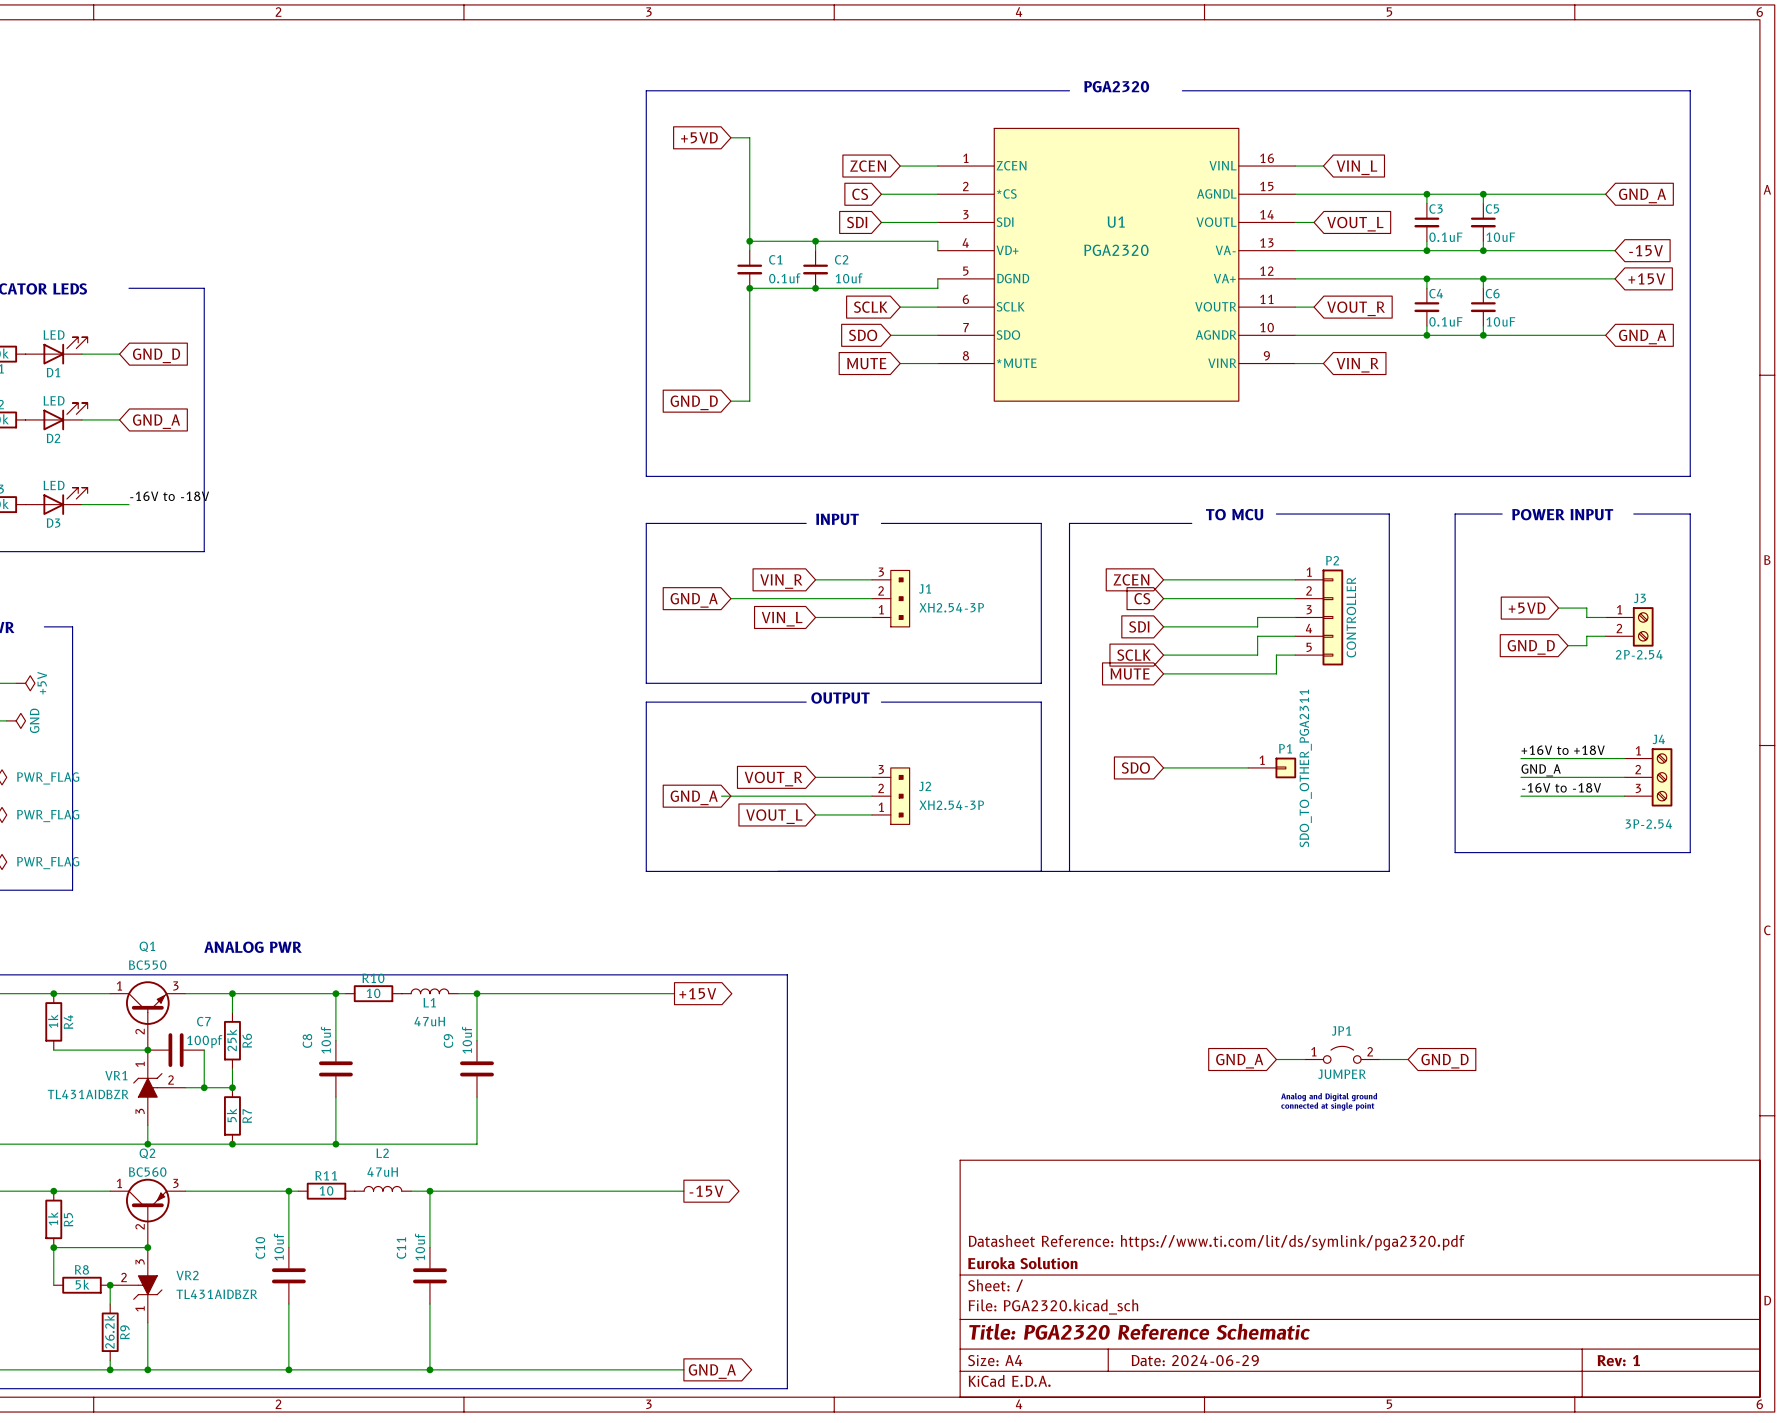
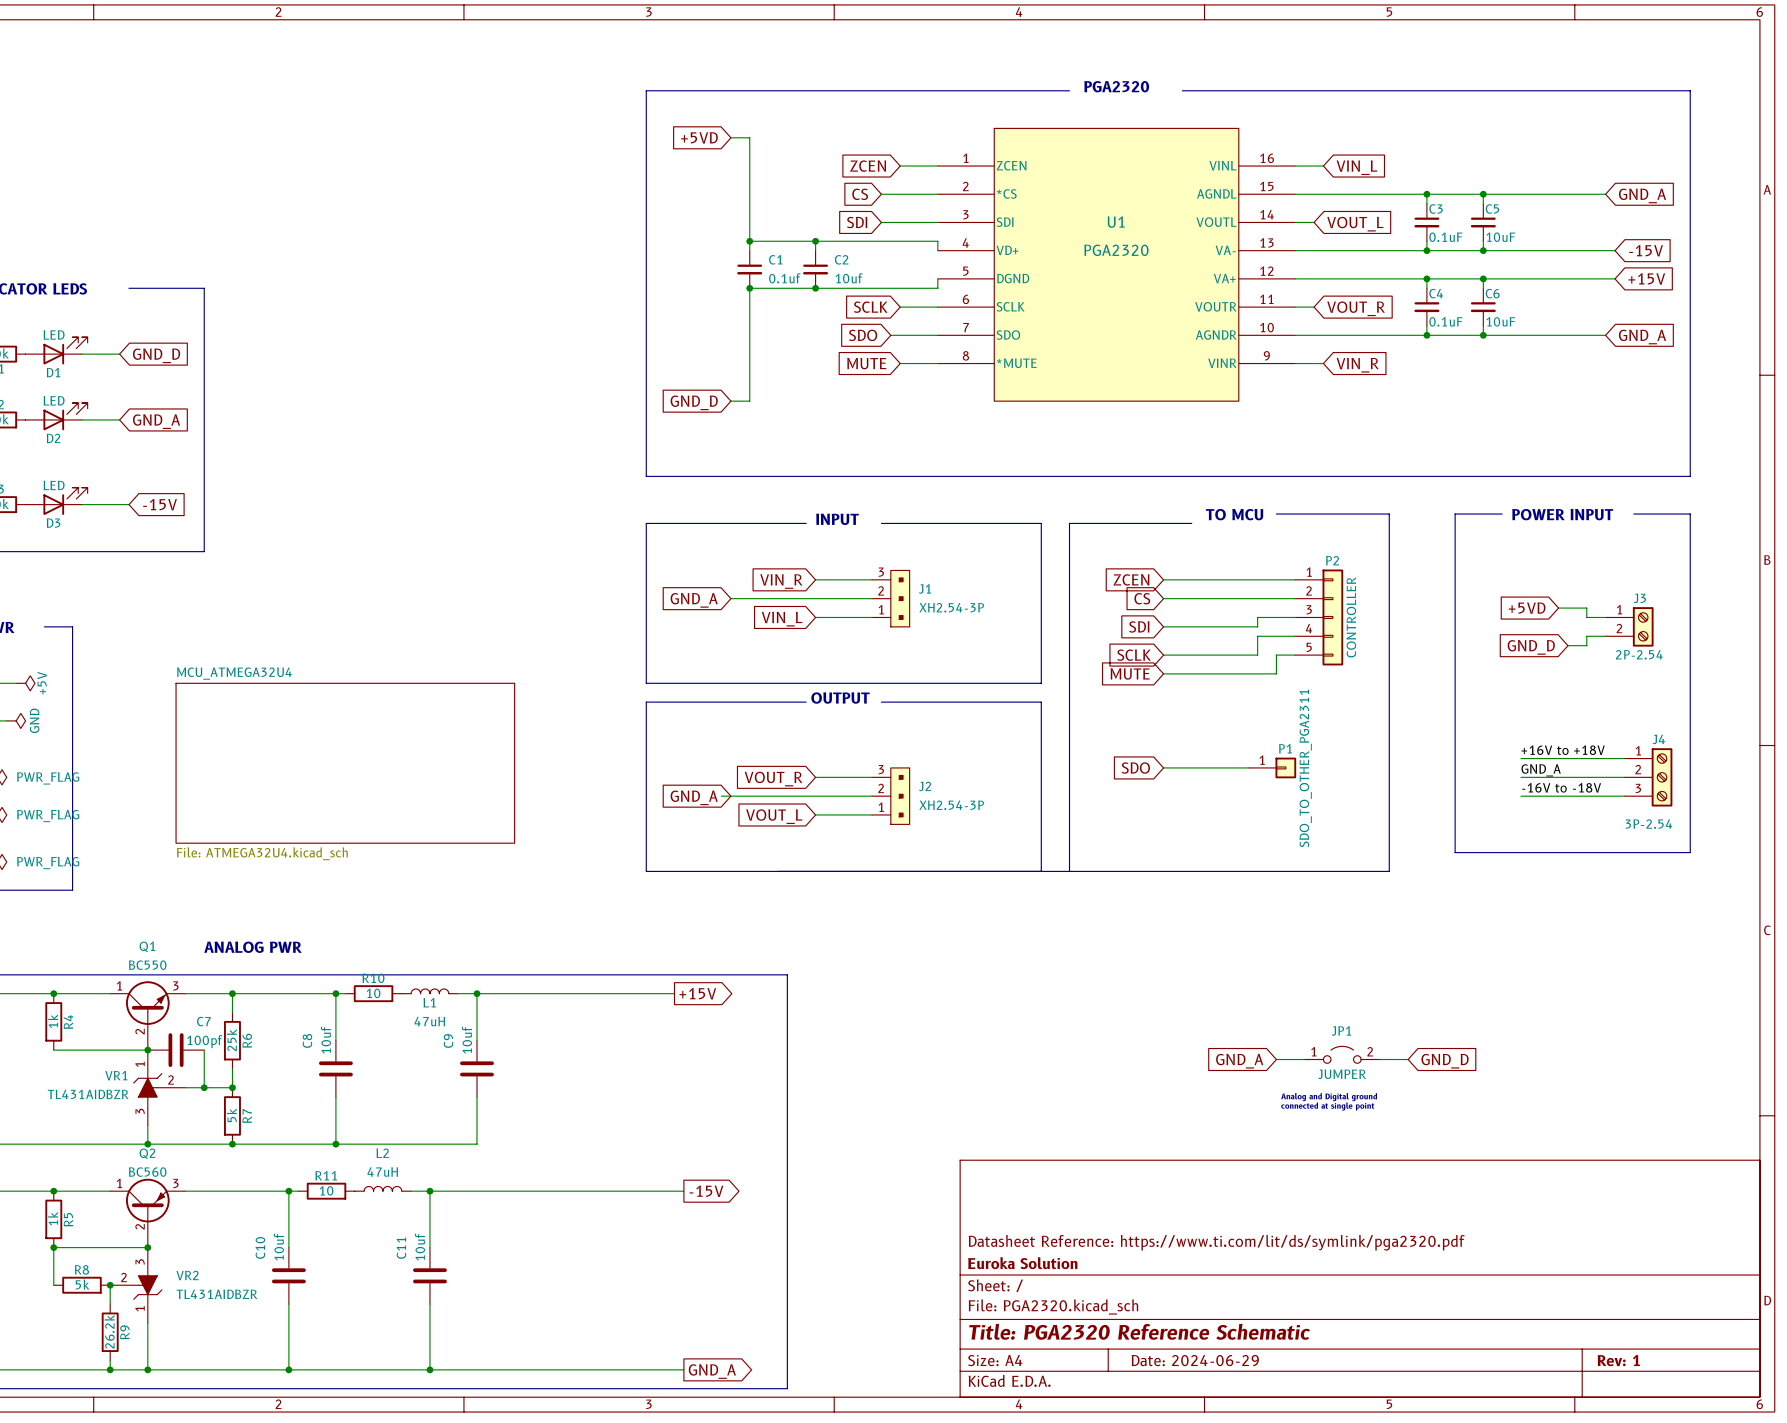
label: -16V to -18V (169, 496) -> none
global label: none -> -15V (160, 504)
sheet MCU_ATMEGA32U4: none -> File: ATMEGA32U4.kicad_sch (345, 763)

